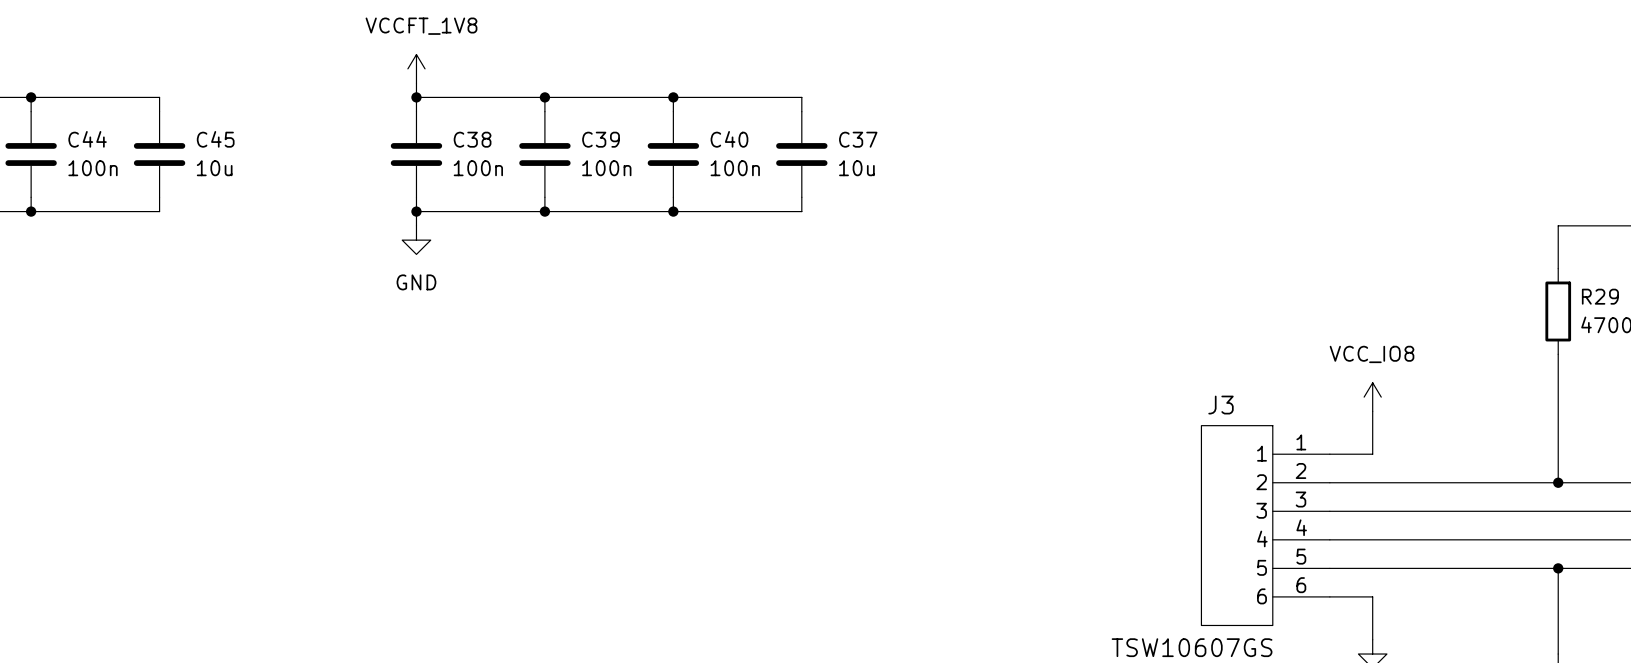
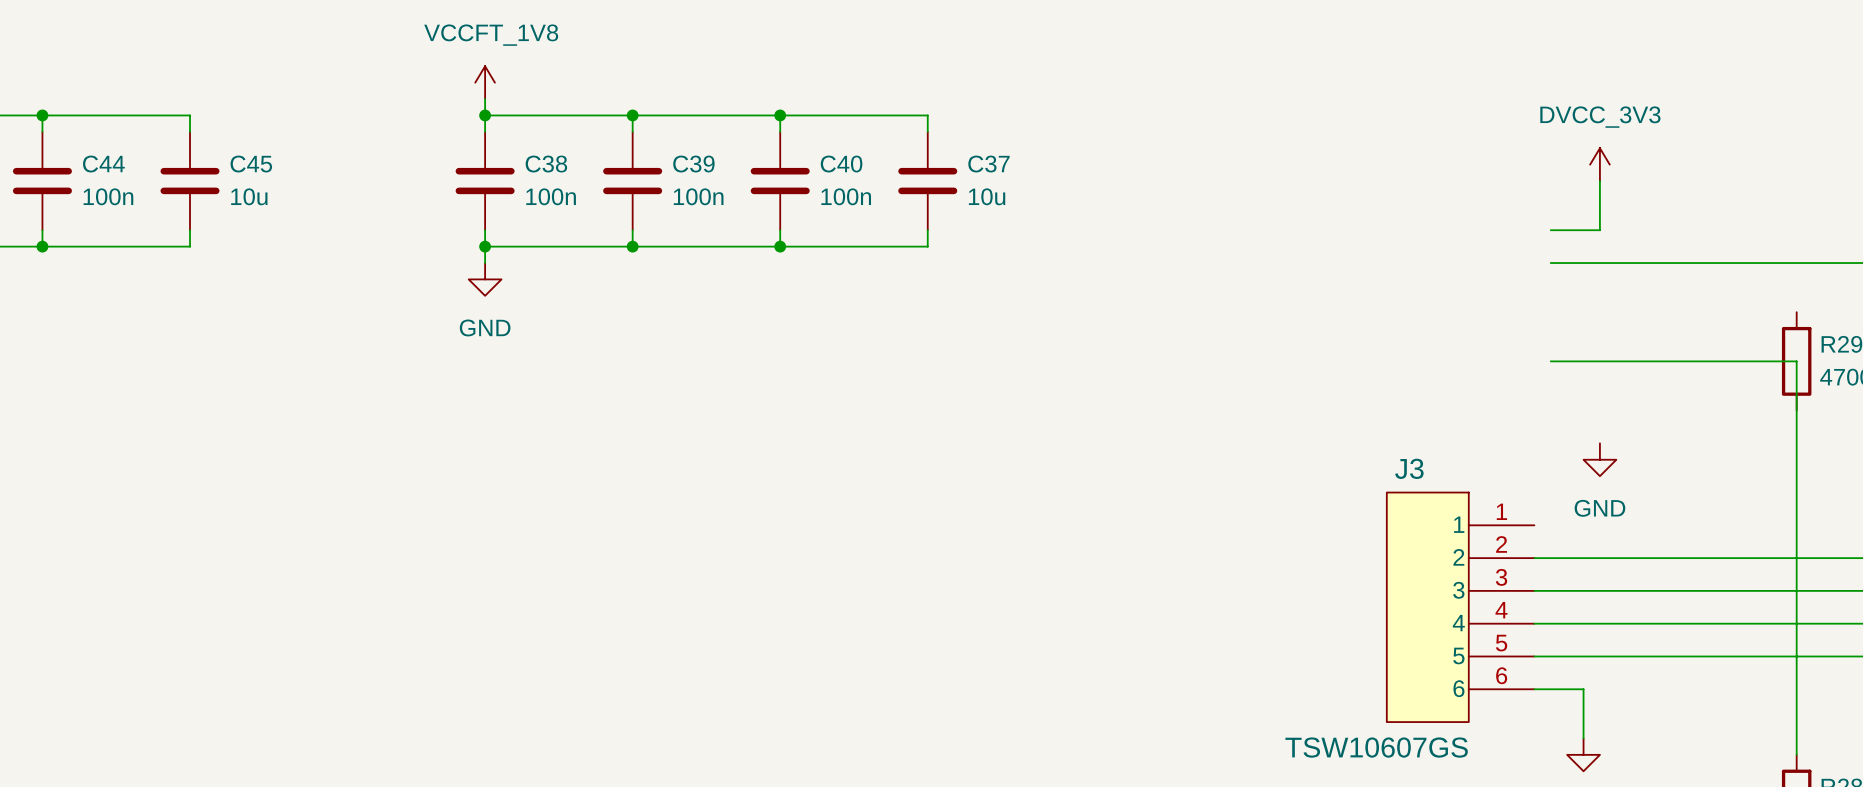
power symbol: none -> DVCC_3V3 (1599, 164)
wire: (1558, 225) (1558, 268) -> (1796, 263) (1550, 263)
wire: none -> (1550, 361) (1796, 361) (1796, 410)
power symbol: VCC_IO8 (1372, 397) -> none
power symbol: none -> GND (1599, 459)
wire: (1372, 411) (1372, 454) (1329, 454) -> (1599, 181) (1599, 230) (1550, 230)
wire: none -> (1796, 558) (1796, 656)
junction: (1558, 482) -> none
junction: (1558, 568) -> none

